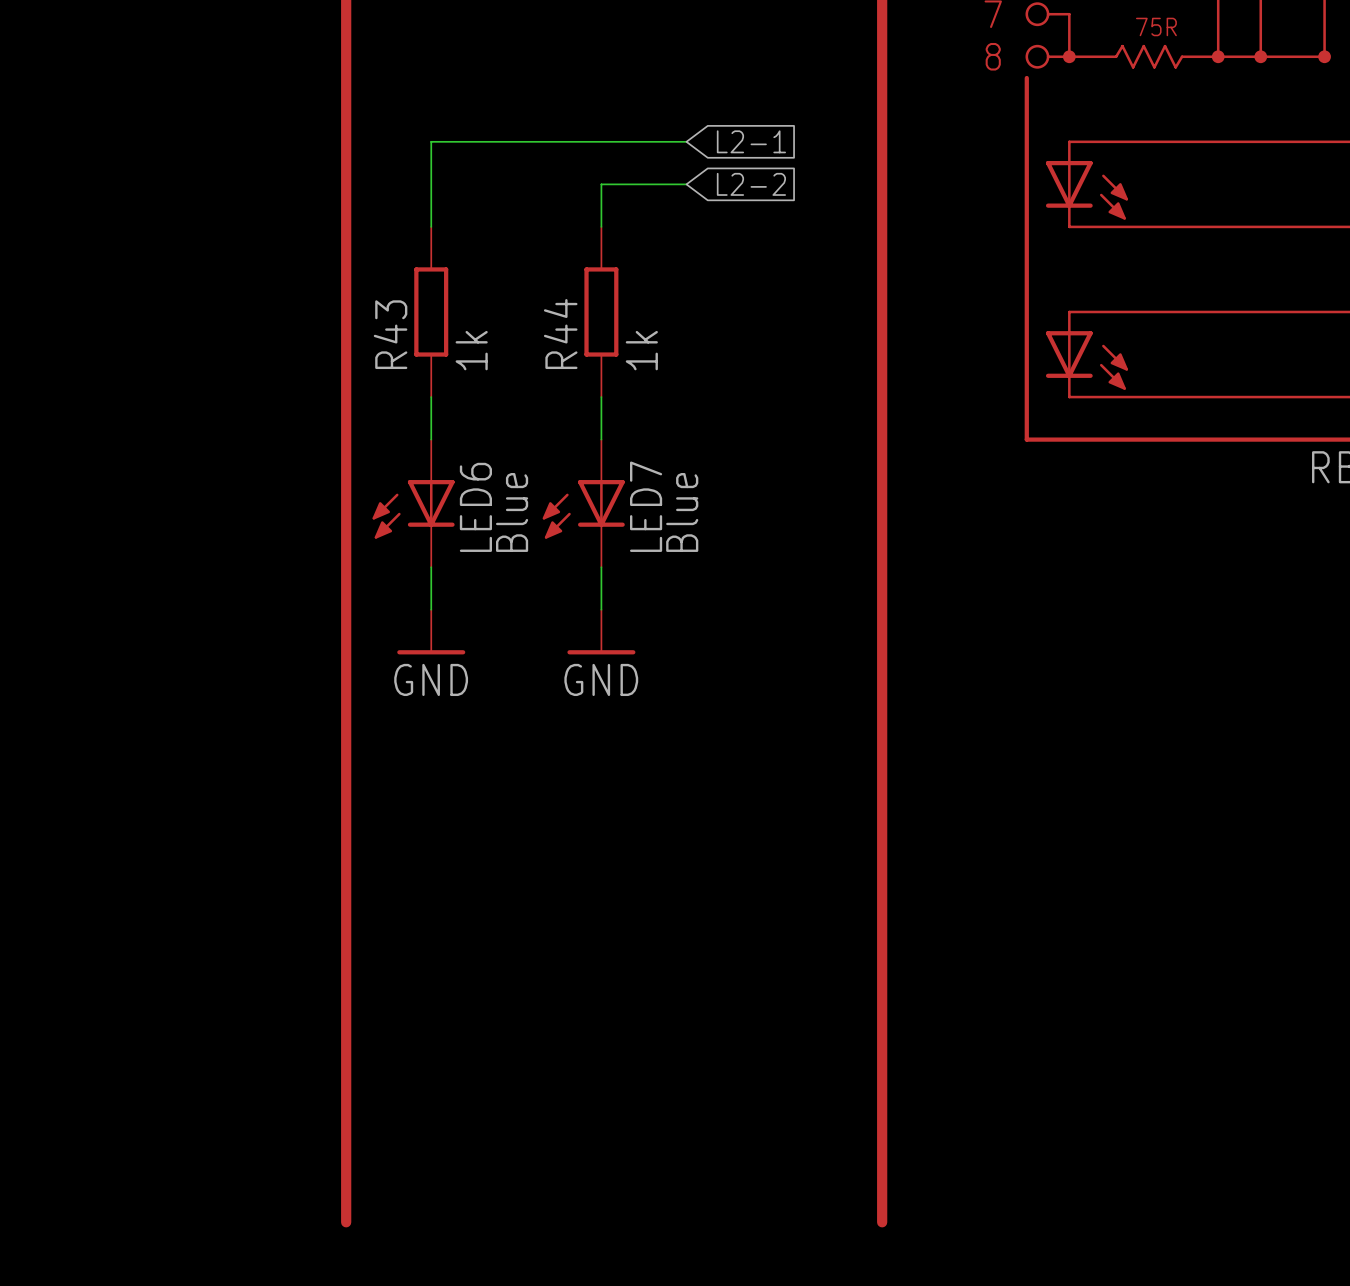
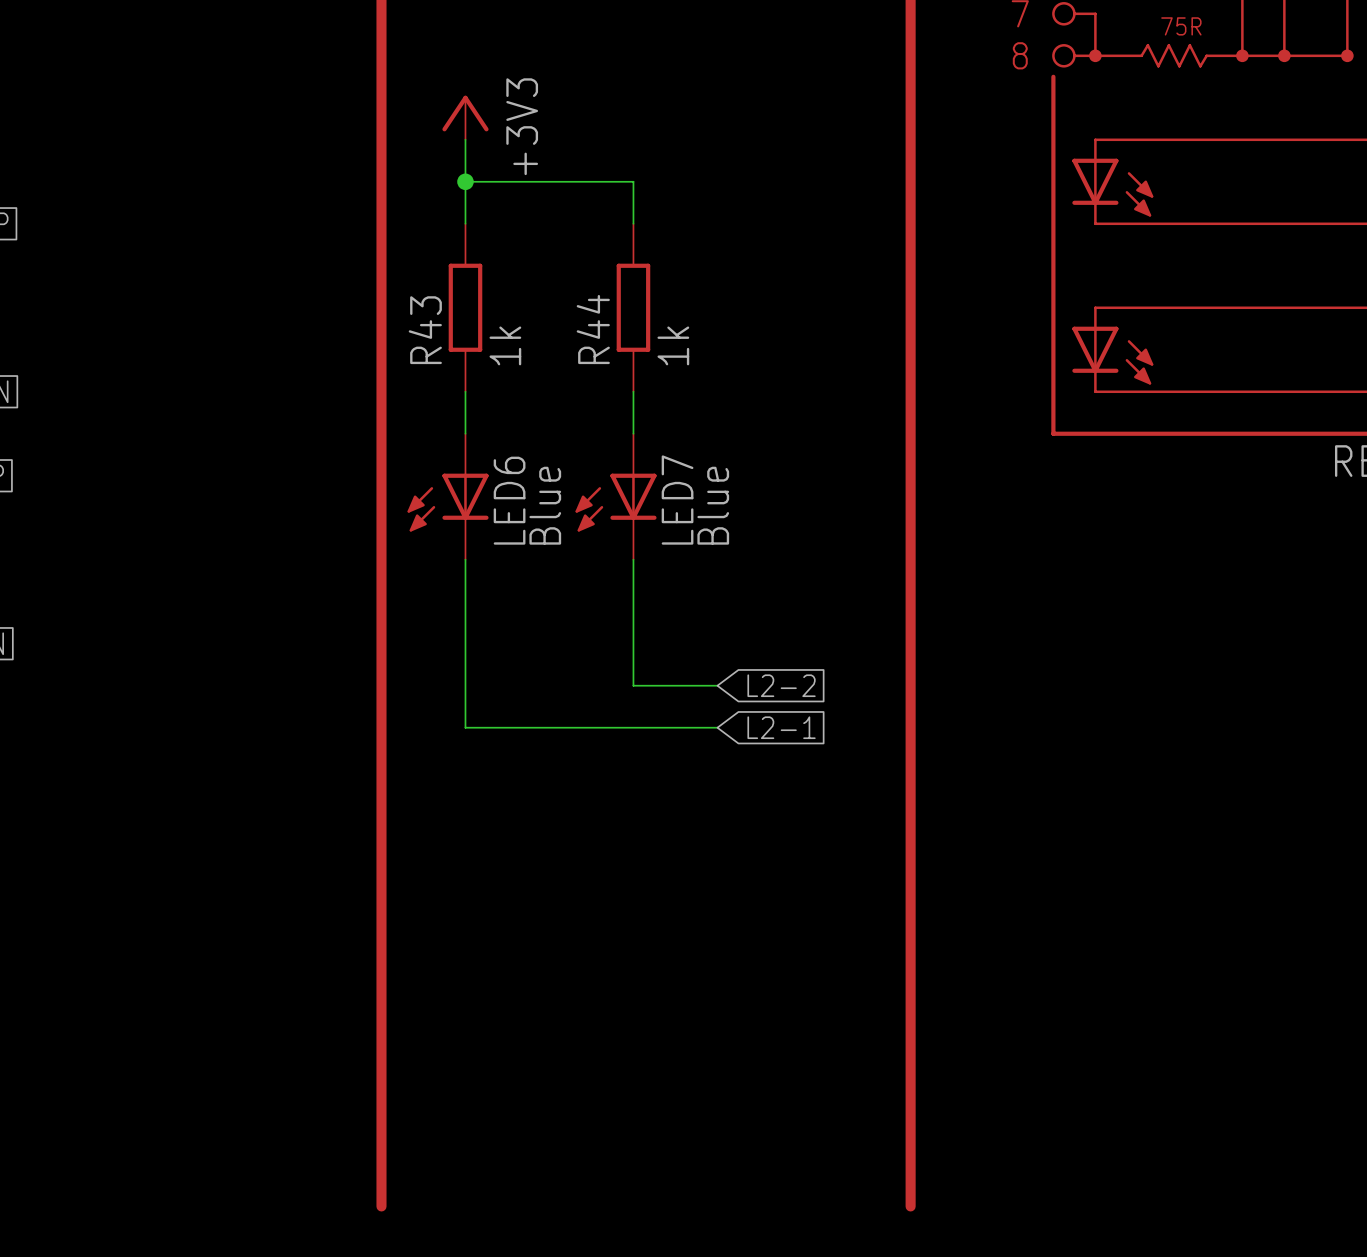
power symbol: none -> +3V3 (465, 117)
wire: (431, 141) (686, 141) -> none
global label: L2-1 (751, 141) -> none
junction: none -> (465, 181)
wire: (601, 184) (686, 184) -> (633, 181) (465, 181)
global label: L2-2 (751, 184) -> none
wire: none -> (465, 601) (465, 727) (717, 727)
wire: none -> (633, 601) (633, 685) (717, 685)
power symbol: GND (431, 632) -> none
power symbol: GND (601, 632) -> none
global label: none -> L2-2 (781, 685)
global label: none -> L2-1 (781, 727)

